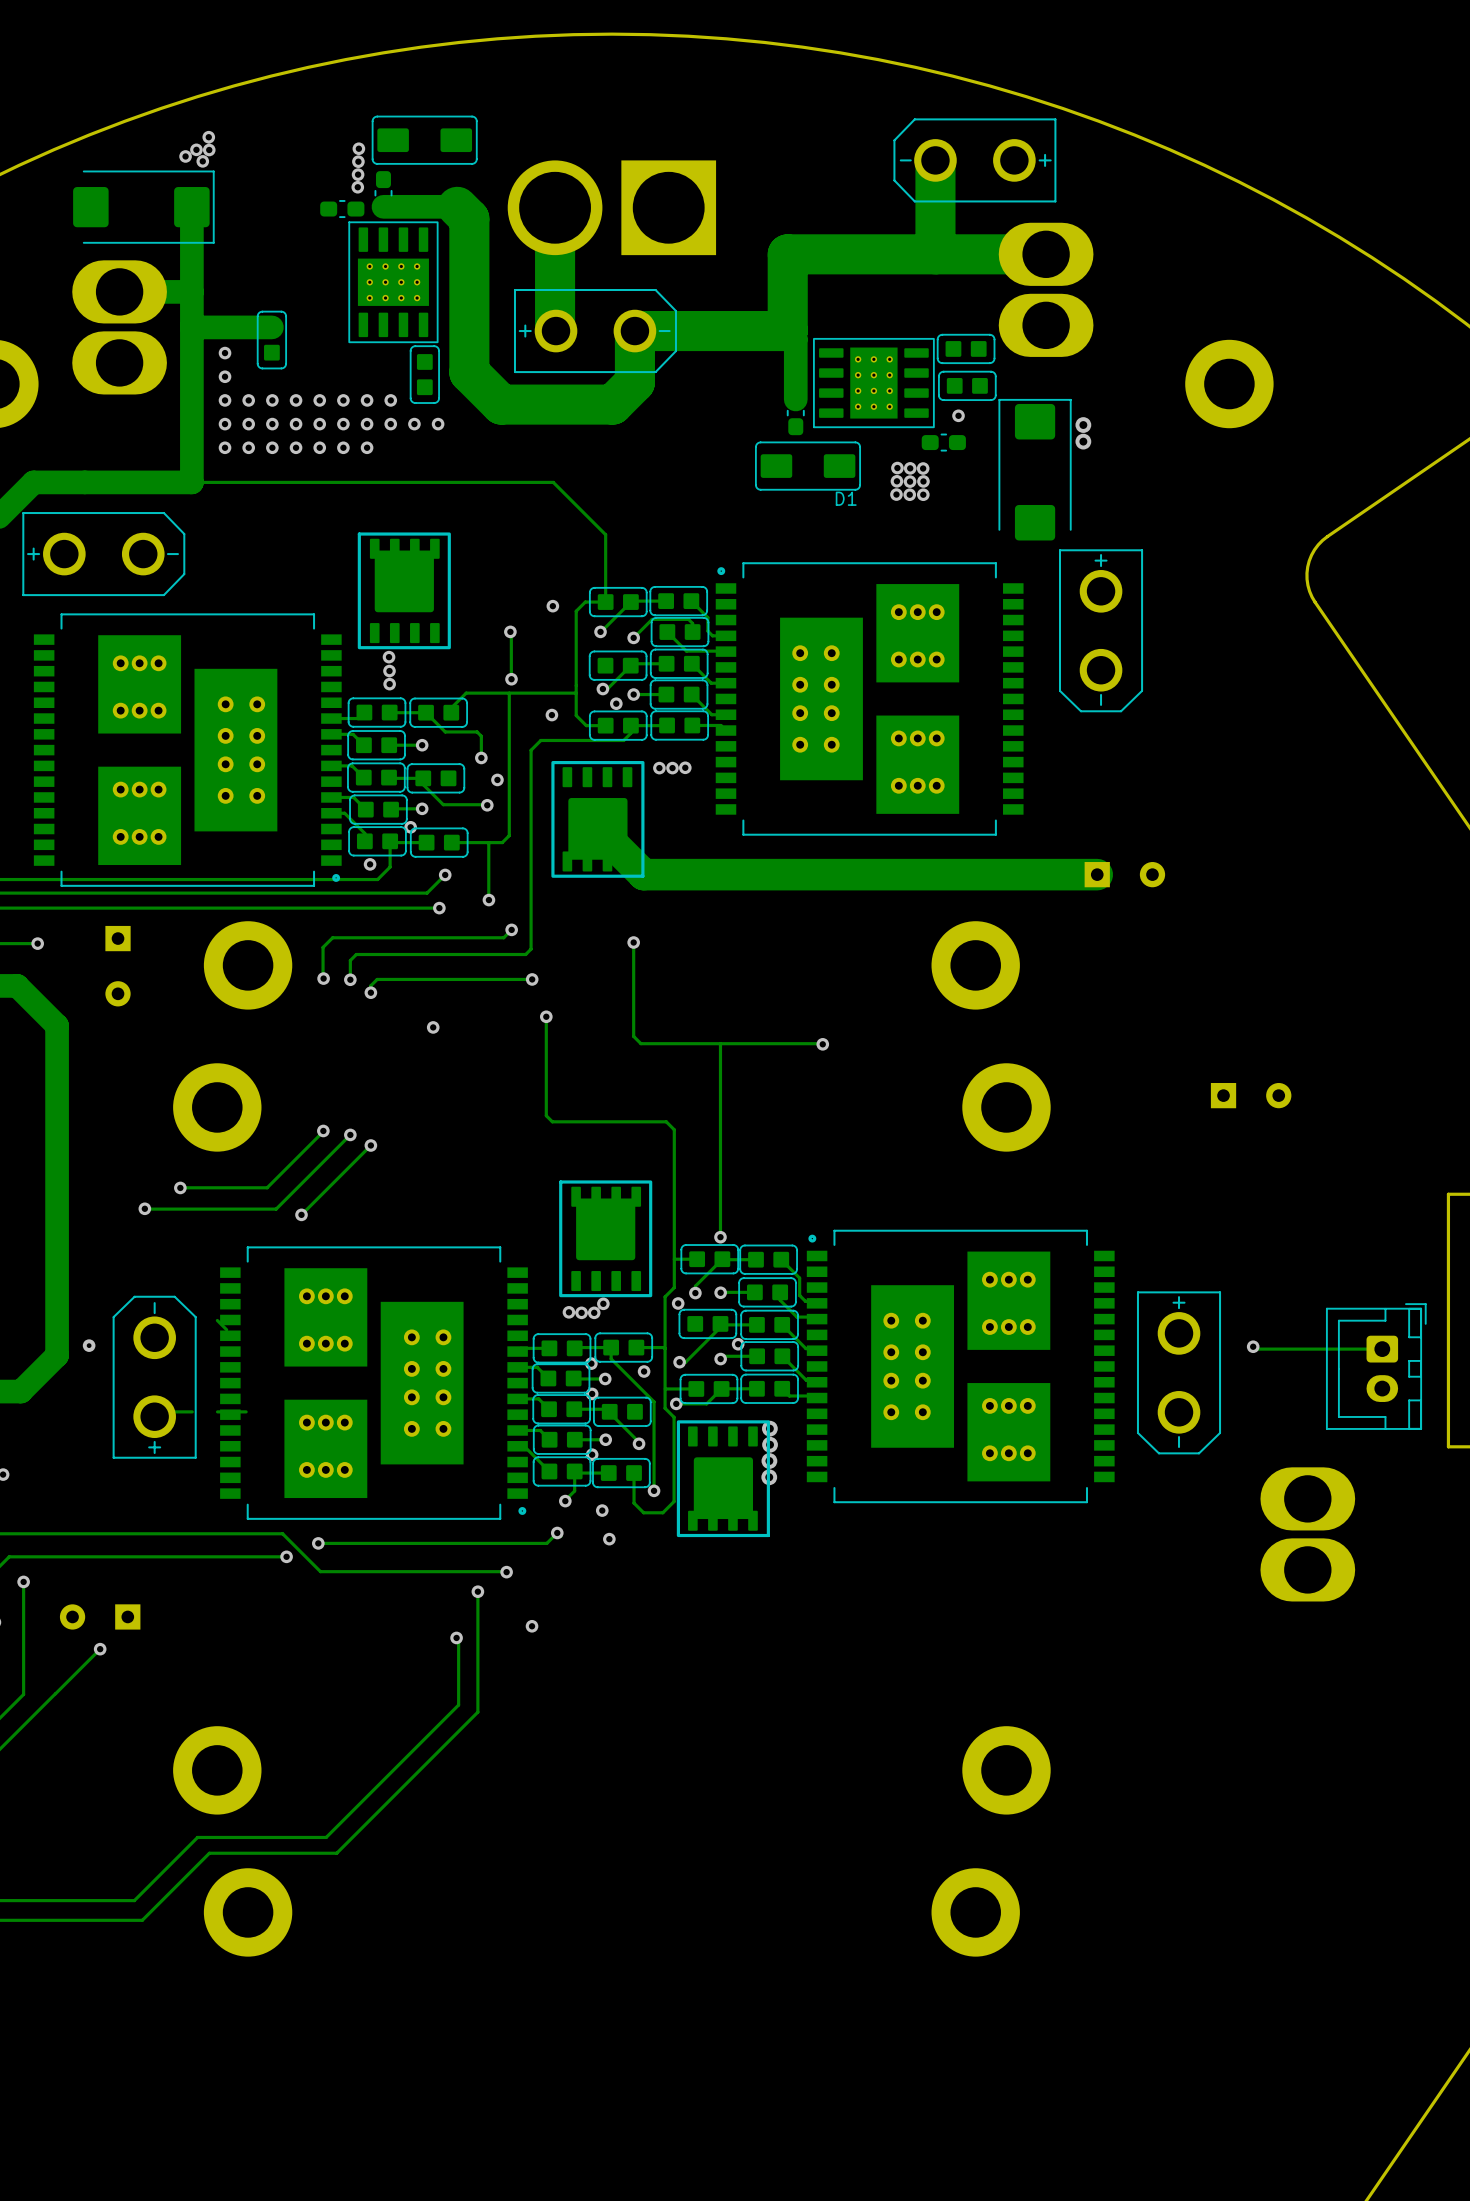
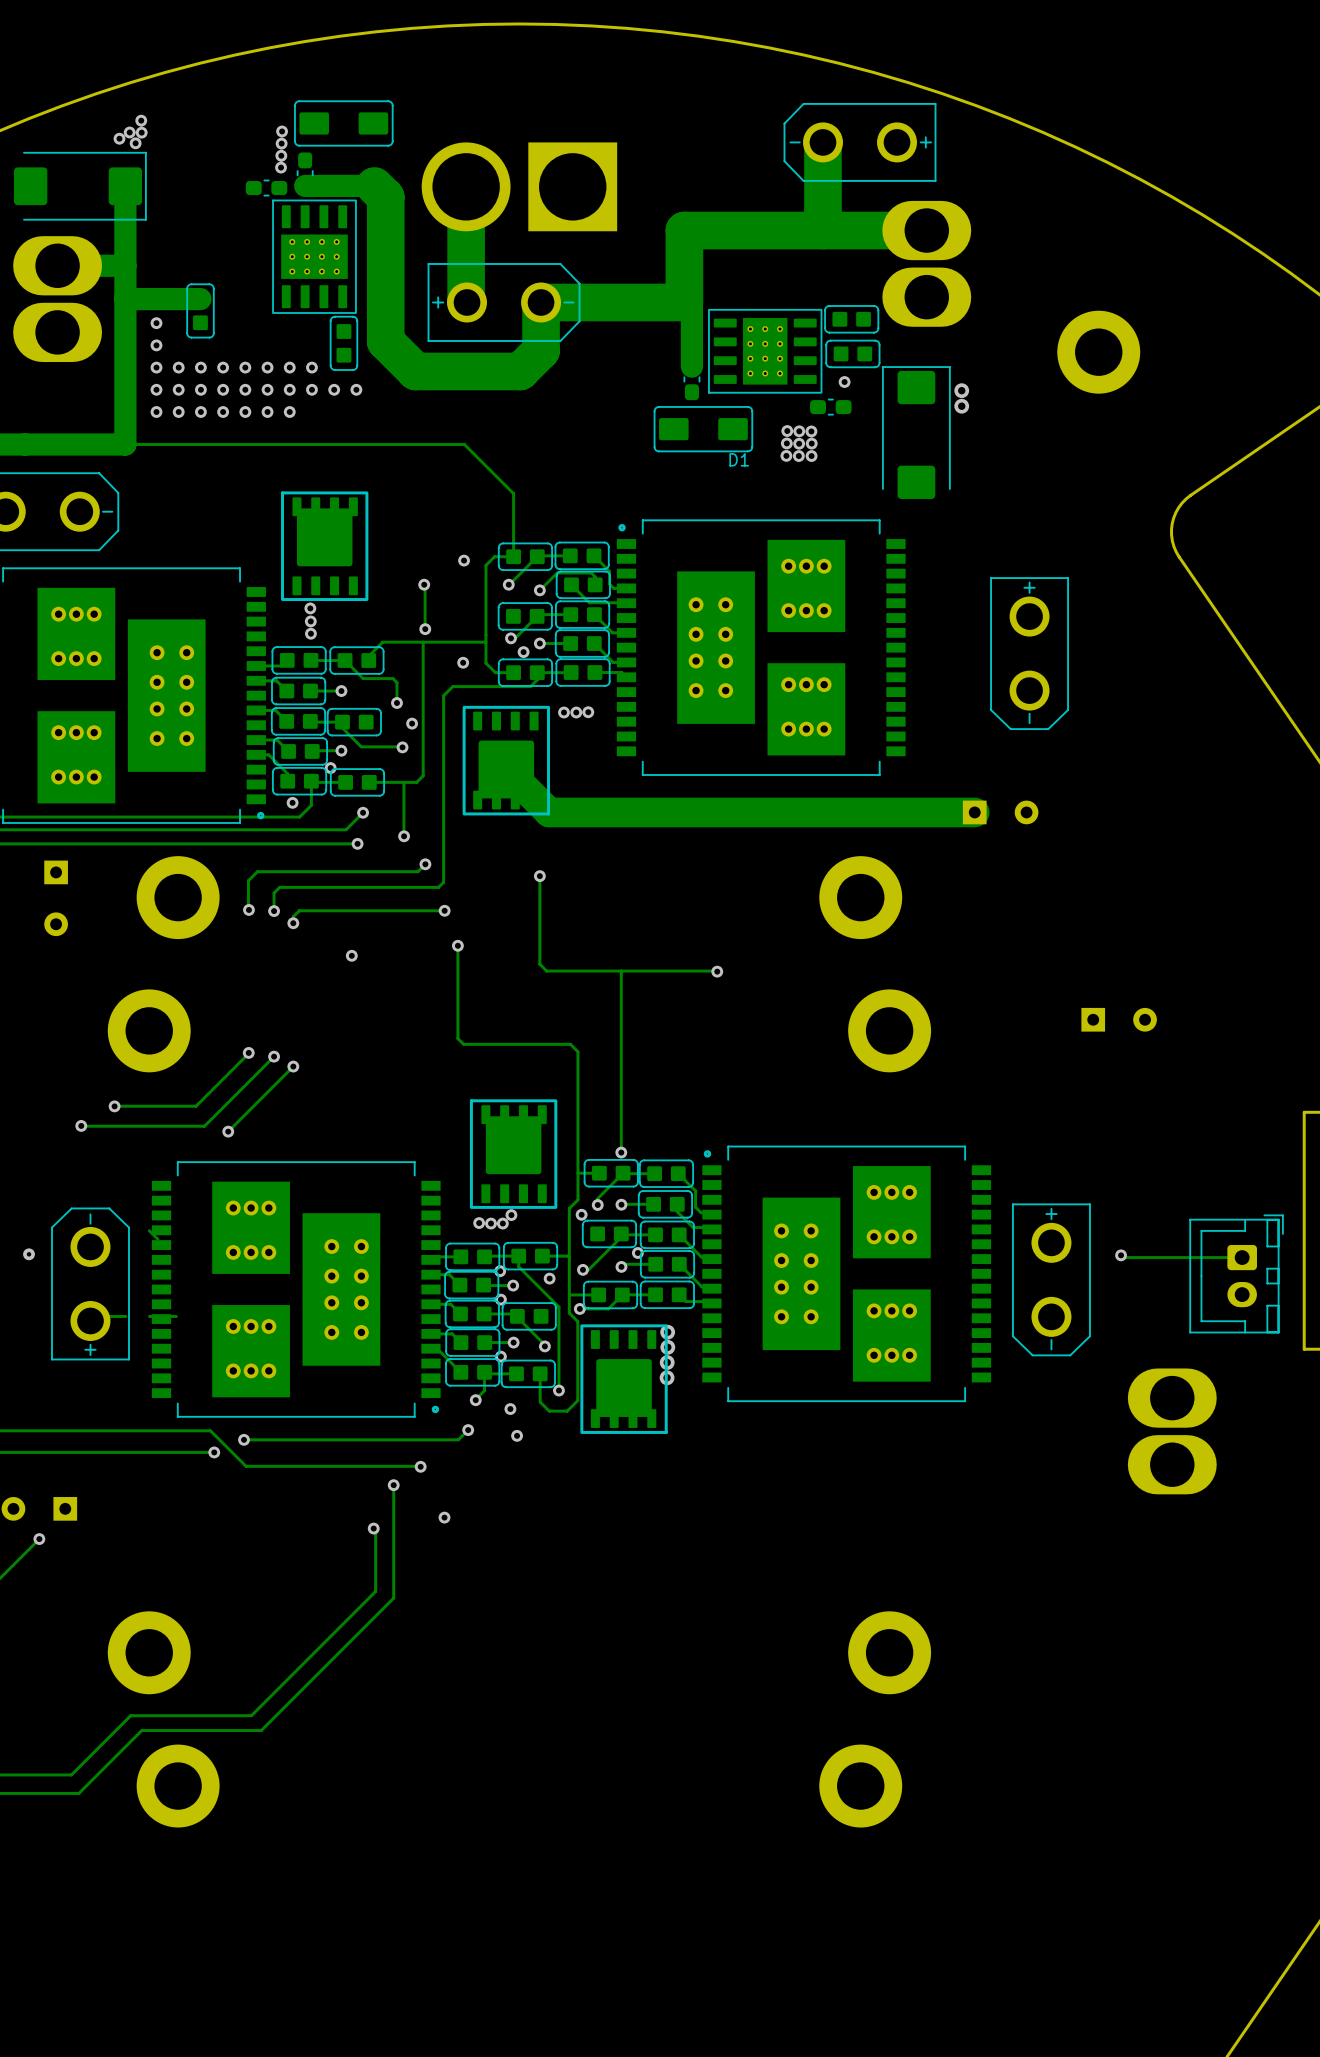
part position: (1101, 630) -> (1029, 653)

